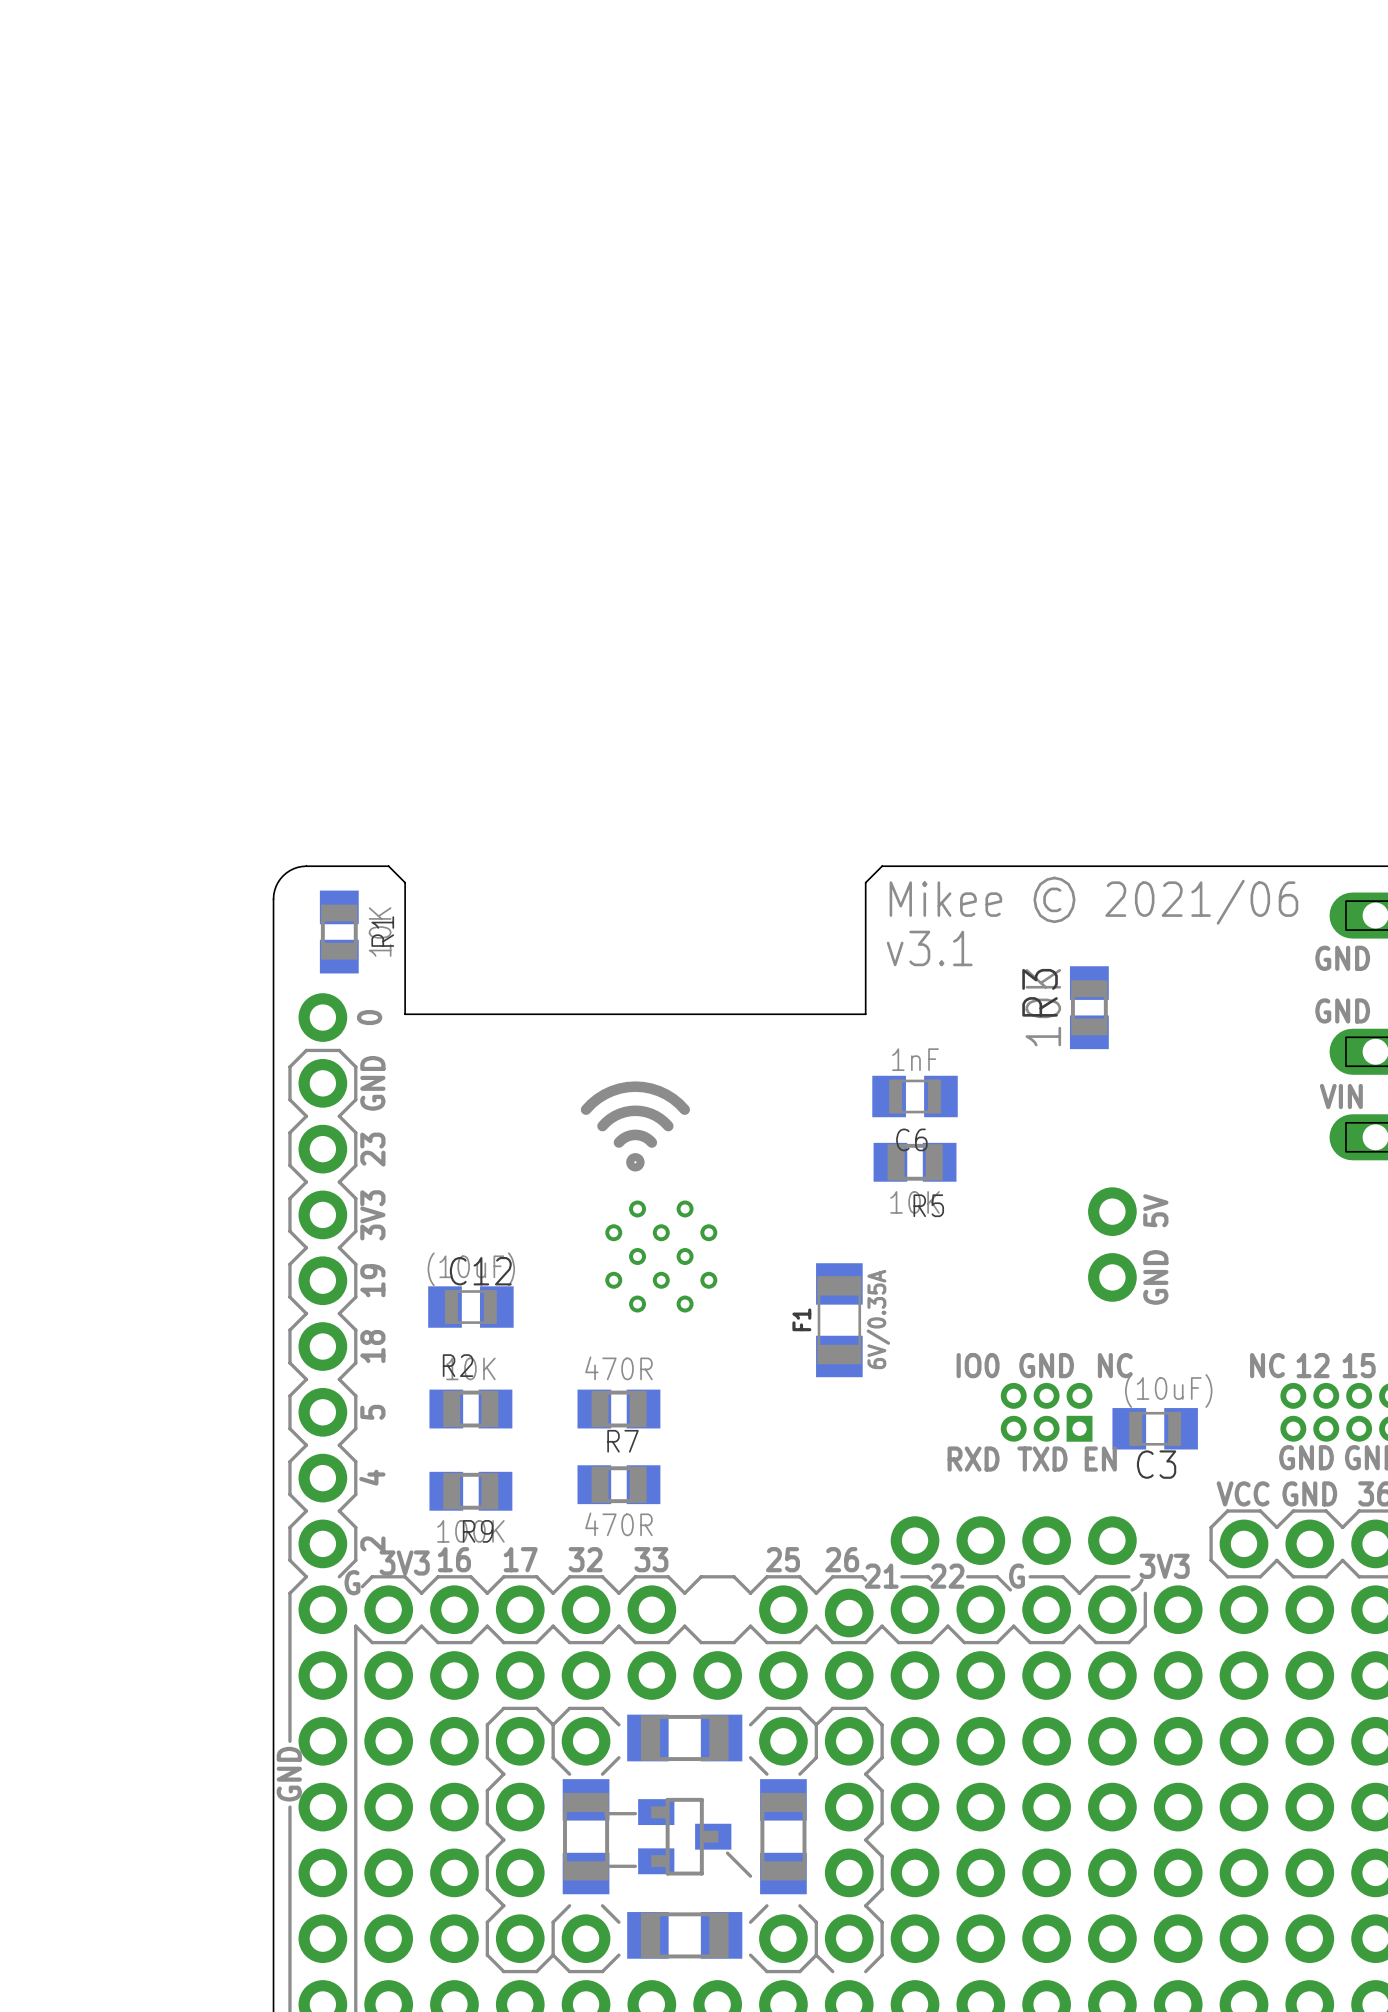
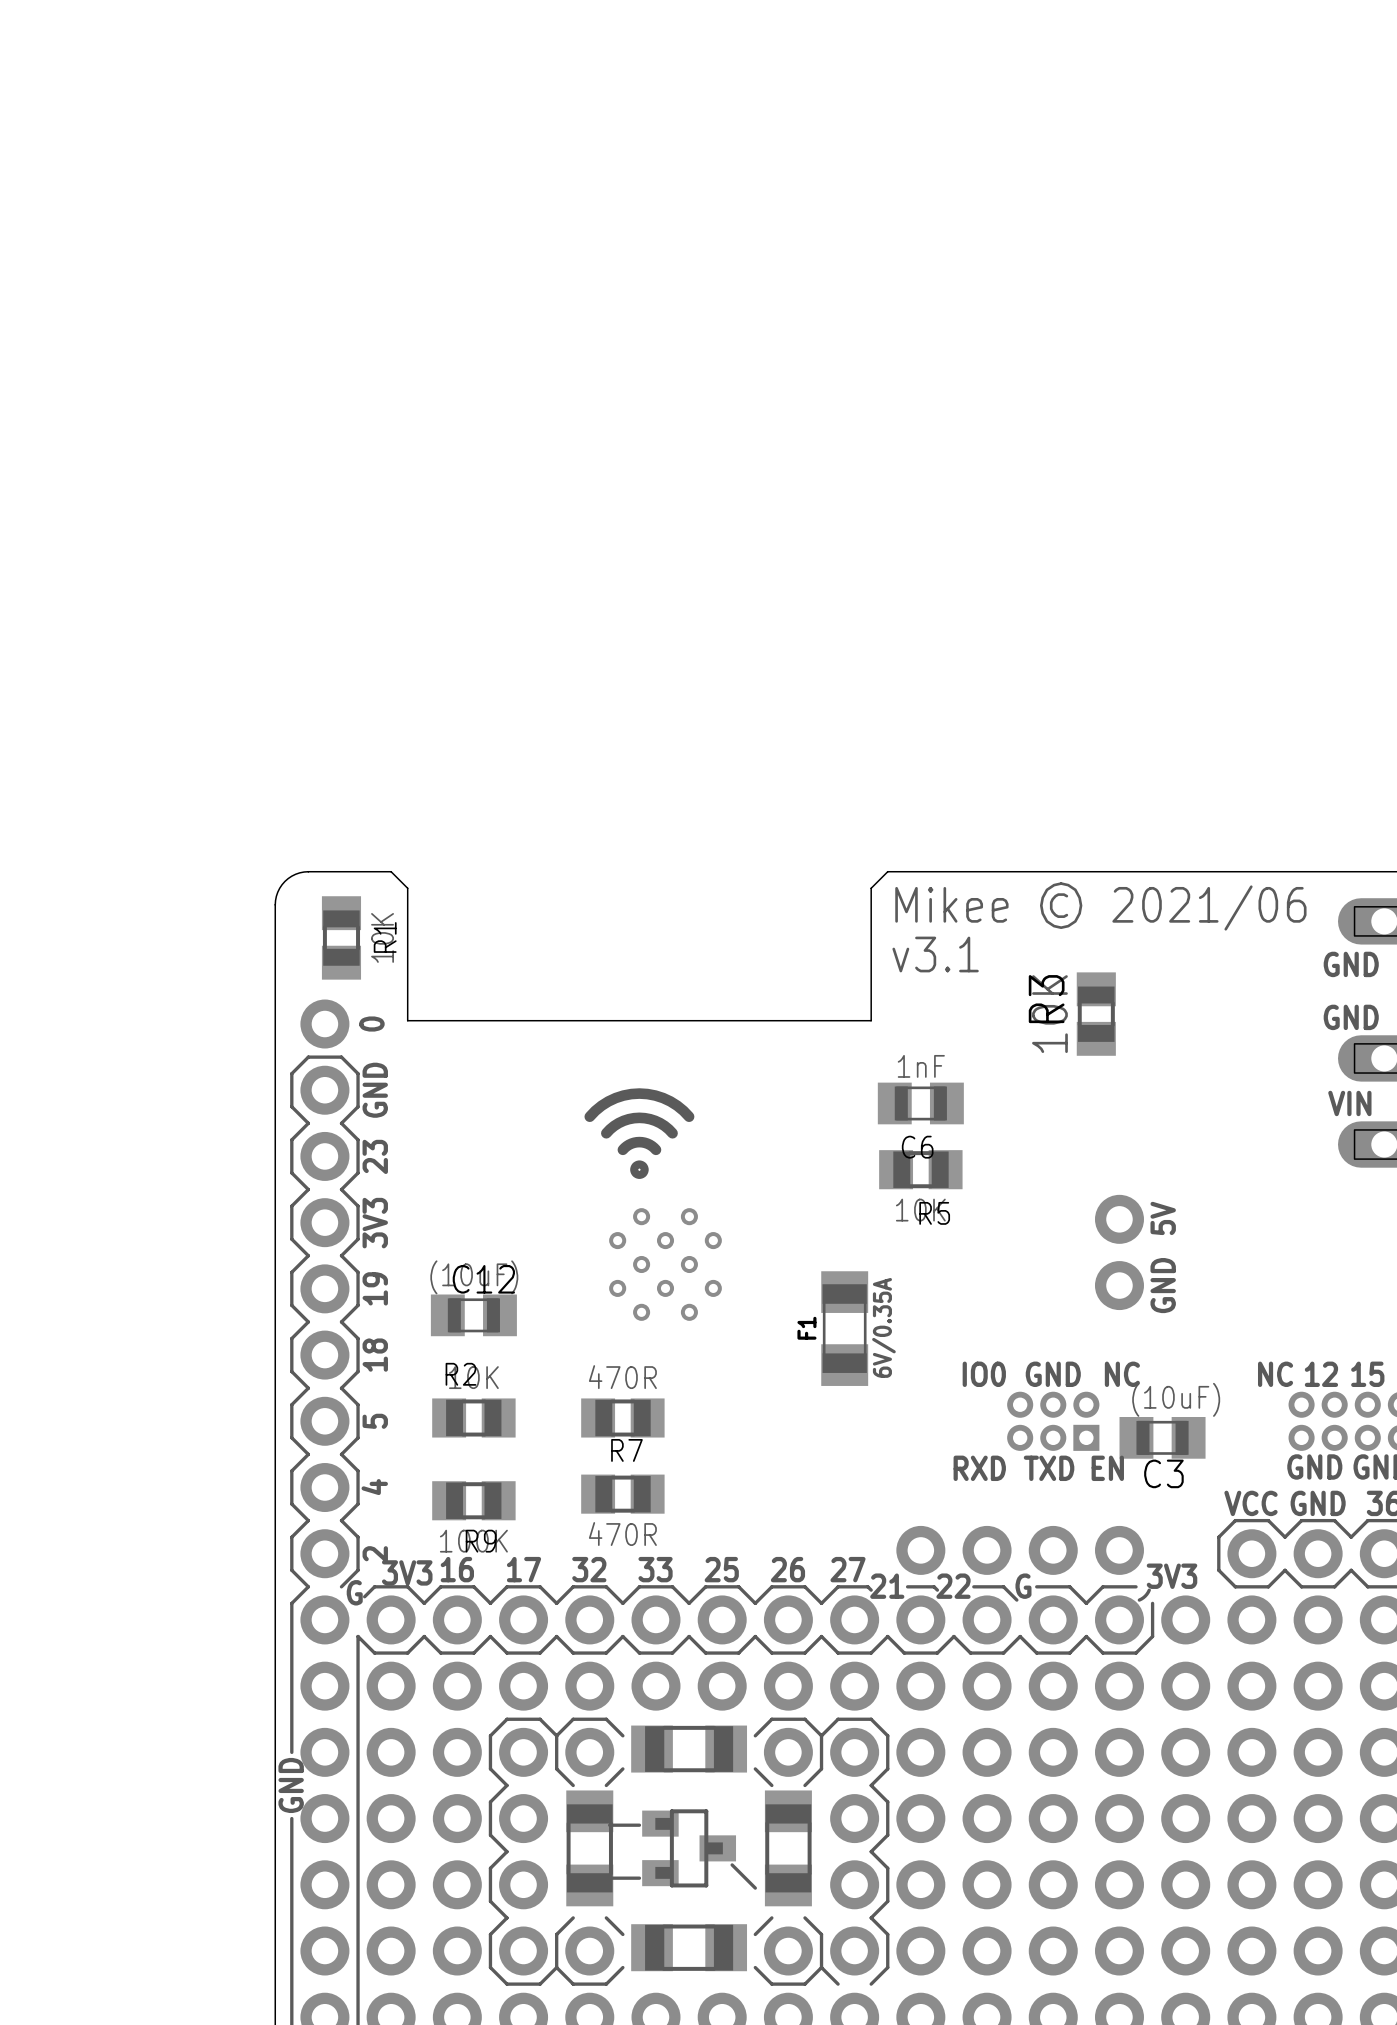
text: none -> 25 (721, 1569)
text: 25 (782, 1559) -> 26 (787, 1569)
text: 26 (842, 1559) -> 27 (848, 1569)
part footprint: [759, 1585, 808, 1635] -> [697, 1595, 880, 1645]
part: (849, 1612) -> none

